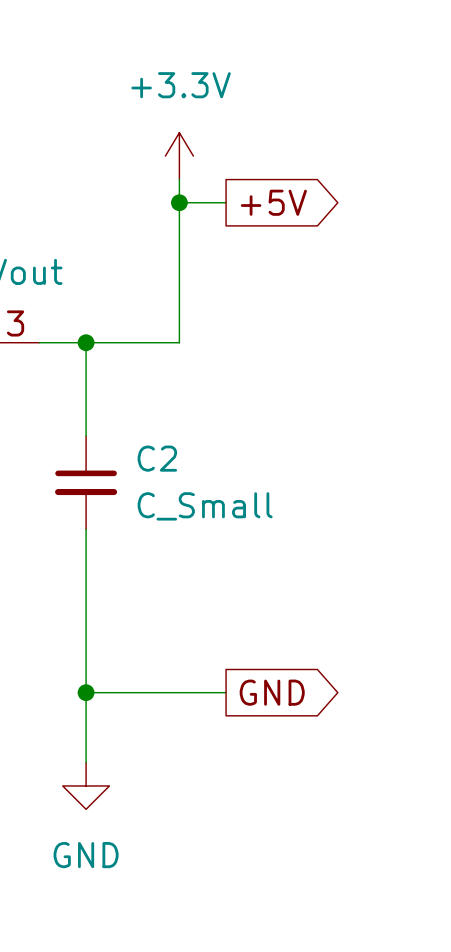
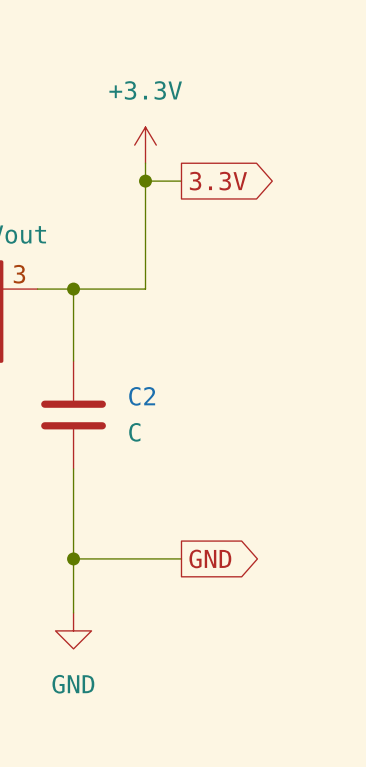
global label: +5V (273, 202) -> 3.3V (218, 181)
C2 symbol: [55, 436, 118, 530] -> [41, 361, 106, 469]
C2 value: C_Small (205, 506) -> C (134, 432)

